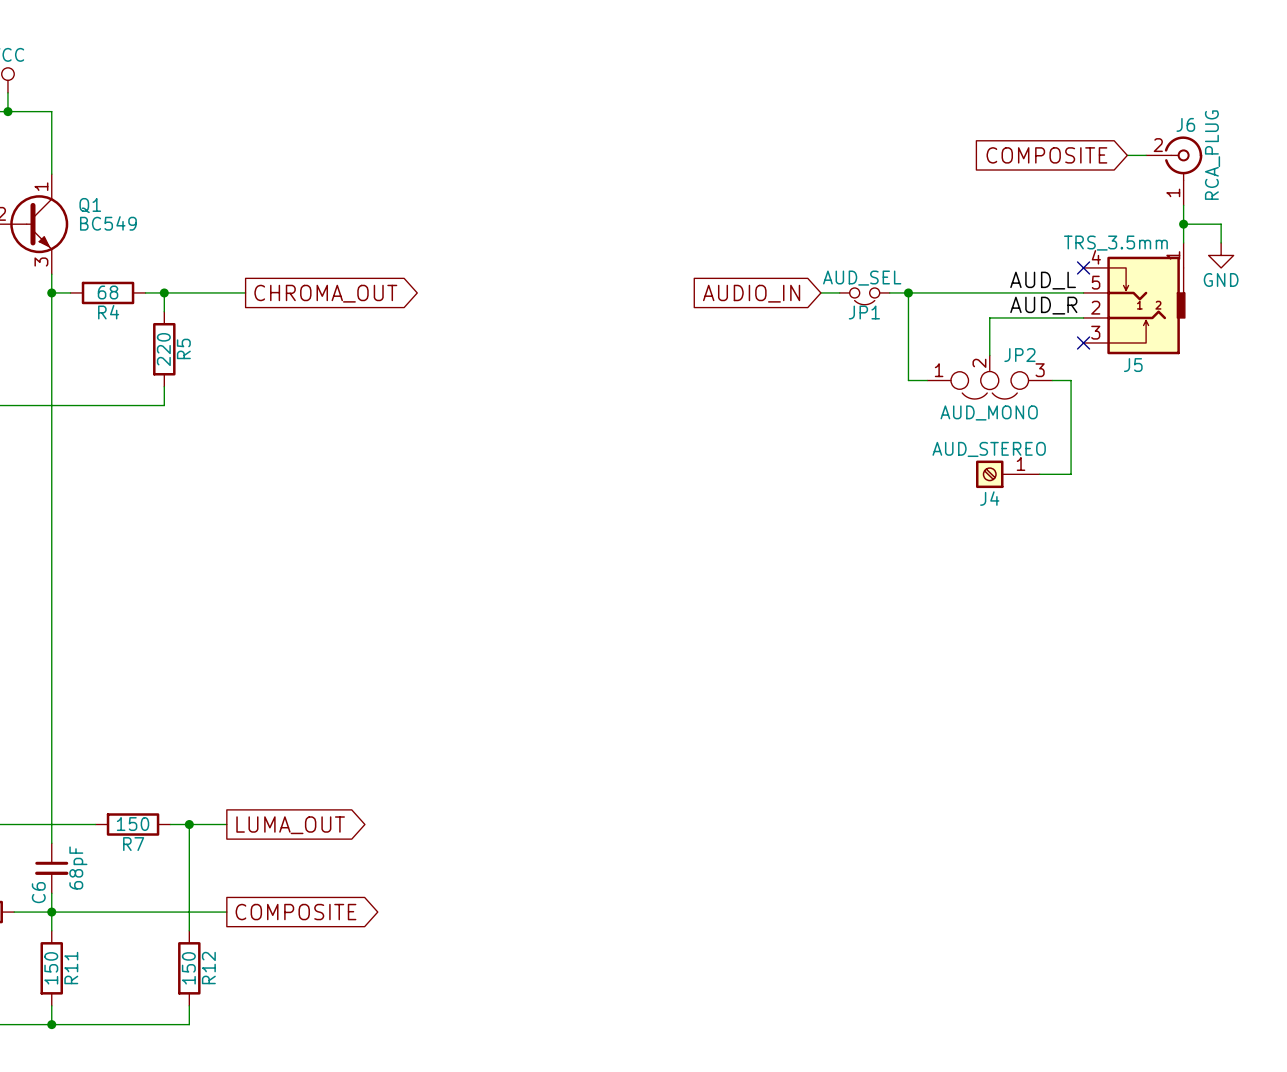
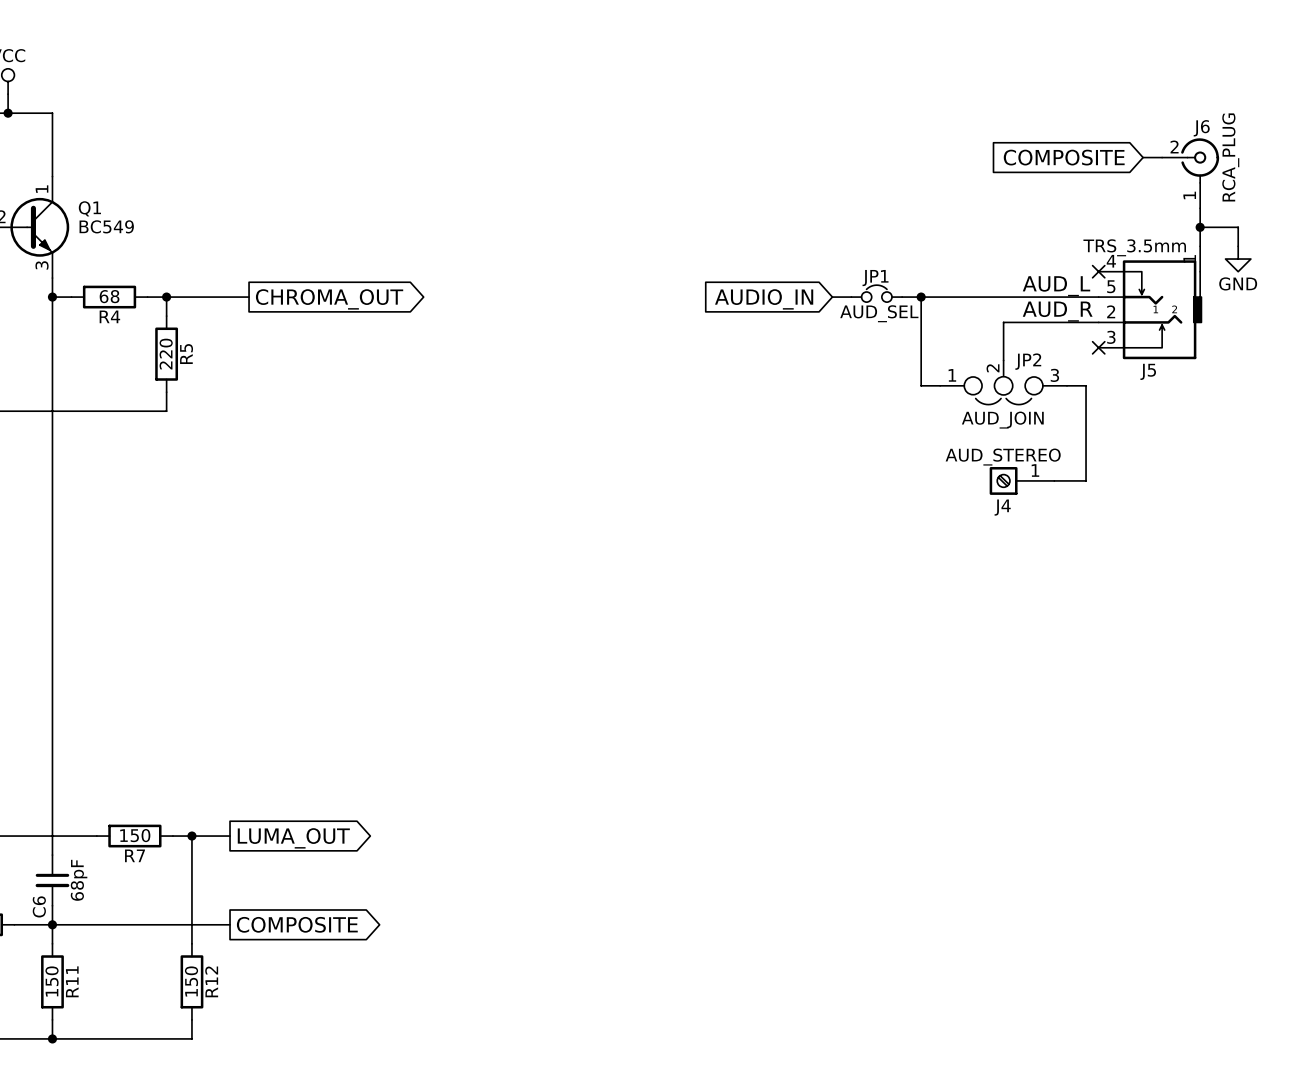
JP1 rotation: 0° (864, 296) -> 180° (876, 293)
JP2 value: AUD_MONO (989, 412) -> AUD_JOIN (1002, 420)

